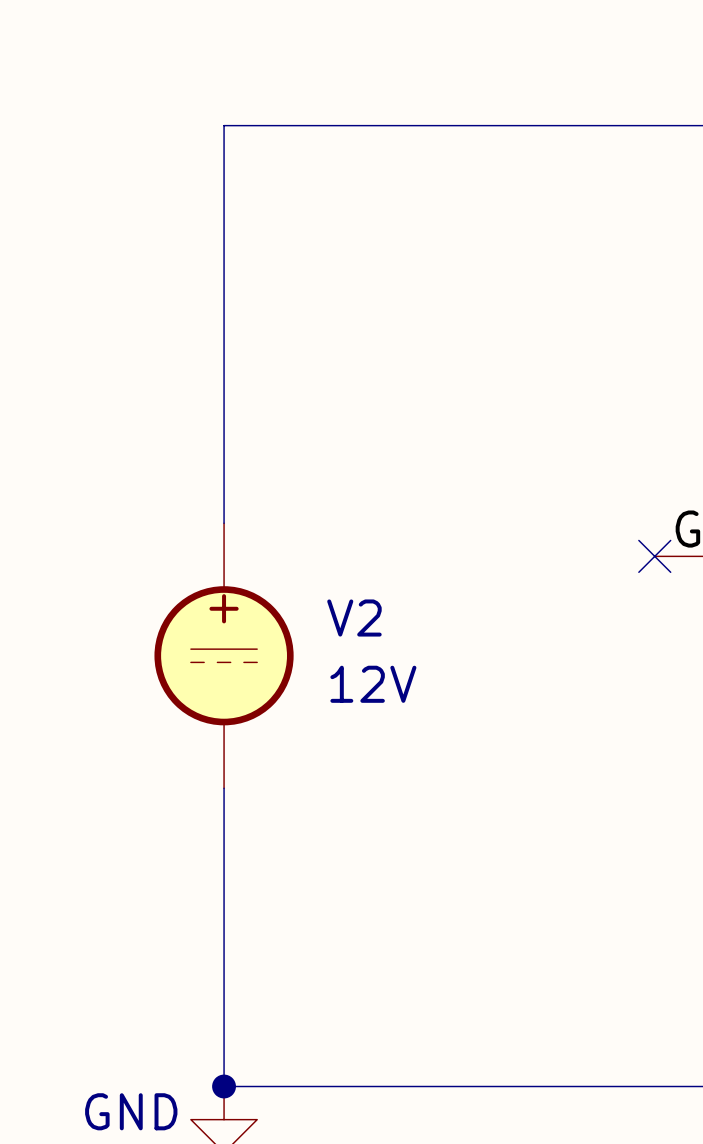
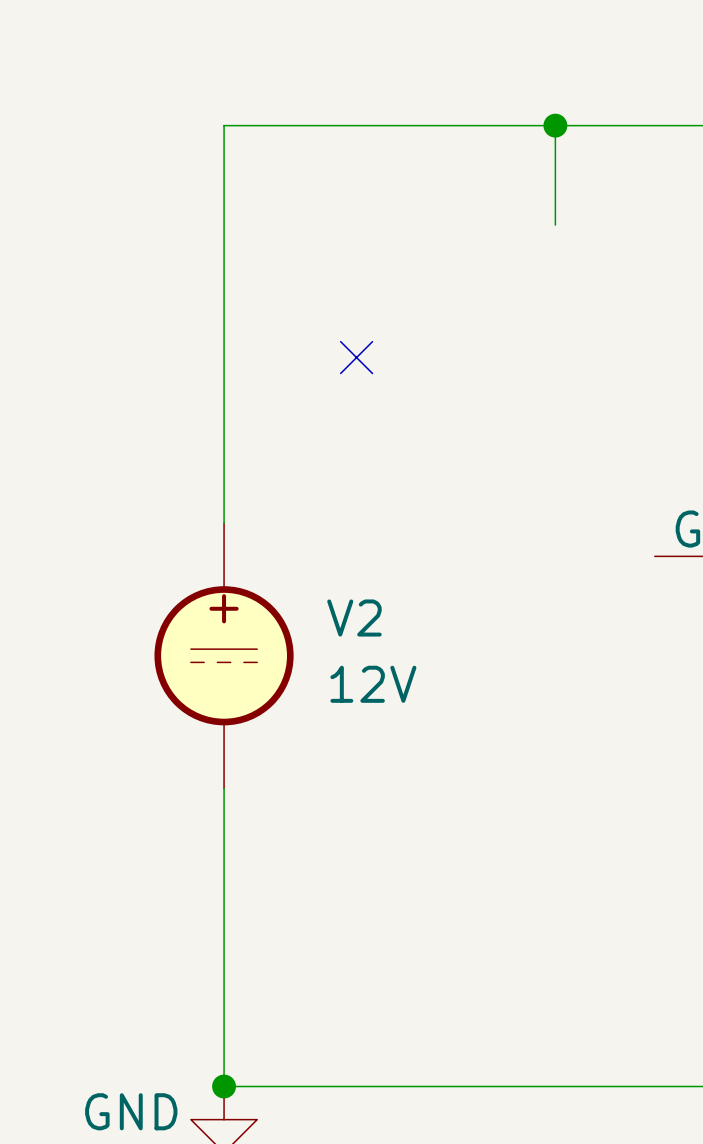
wire: none -> (555, 125) (555, 225)
junction: none -> (555, 125)
no-connect mark: none -> (356, 357)
no-connect mark: (654, 556) -> none

